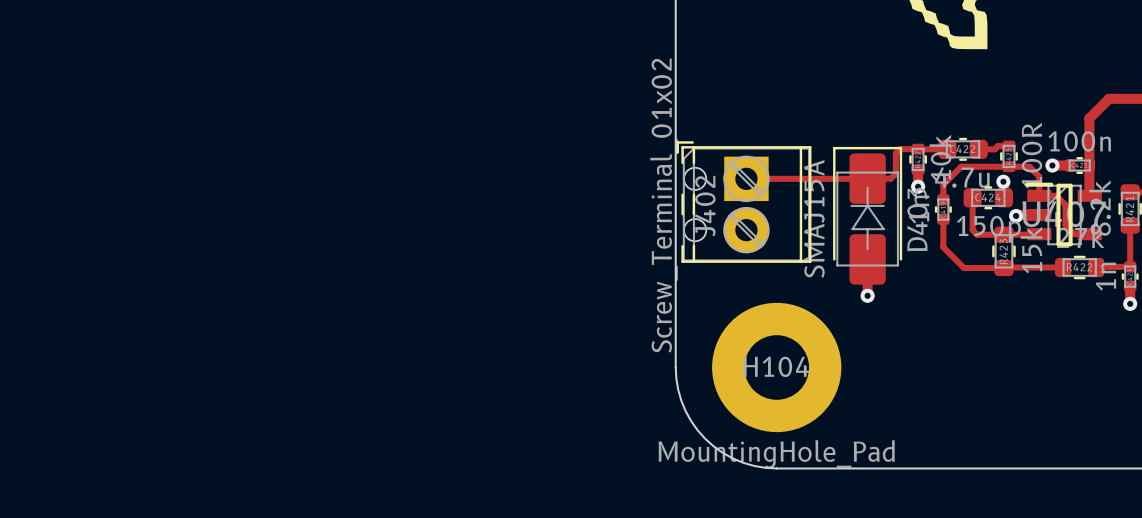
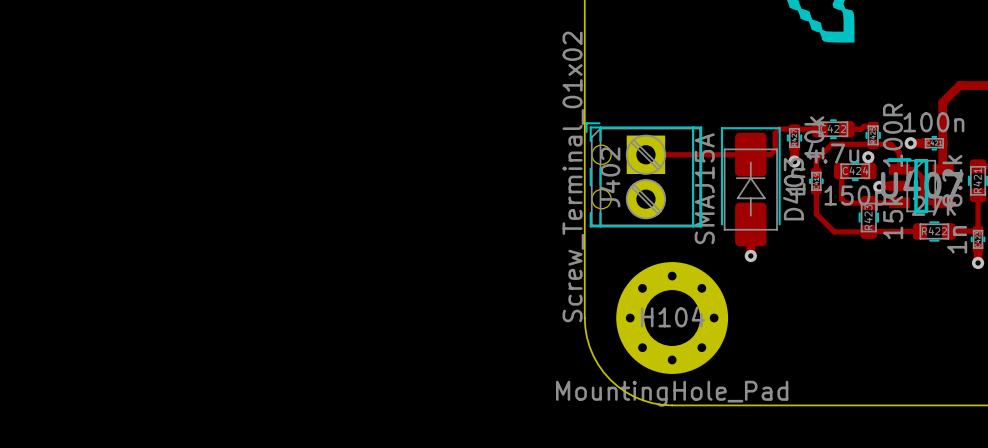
H104 footprint: [712, 302, 842, 433] -> [616, 262, 729, 374]

